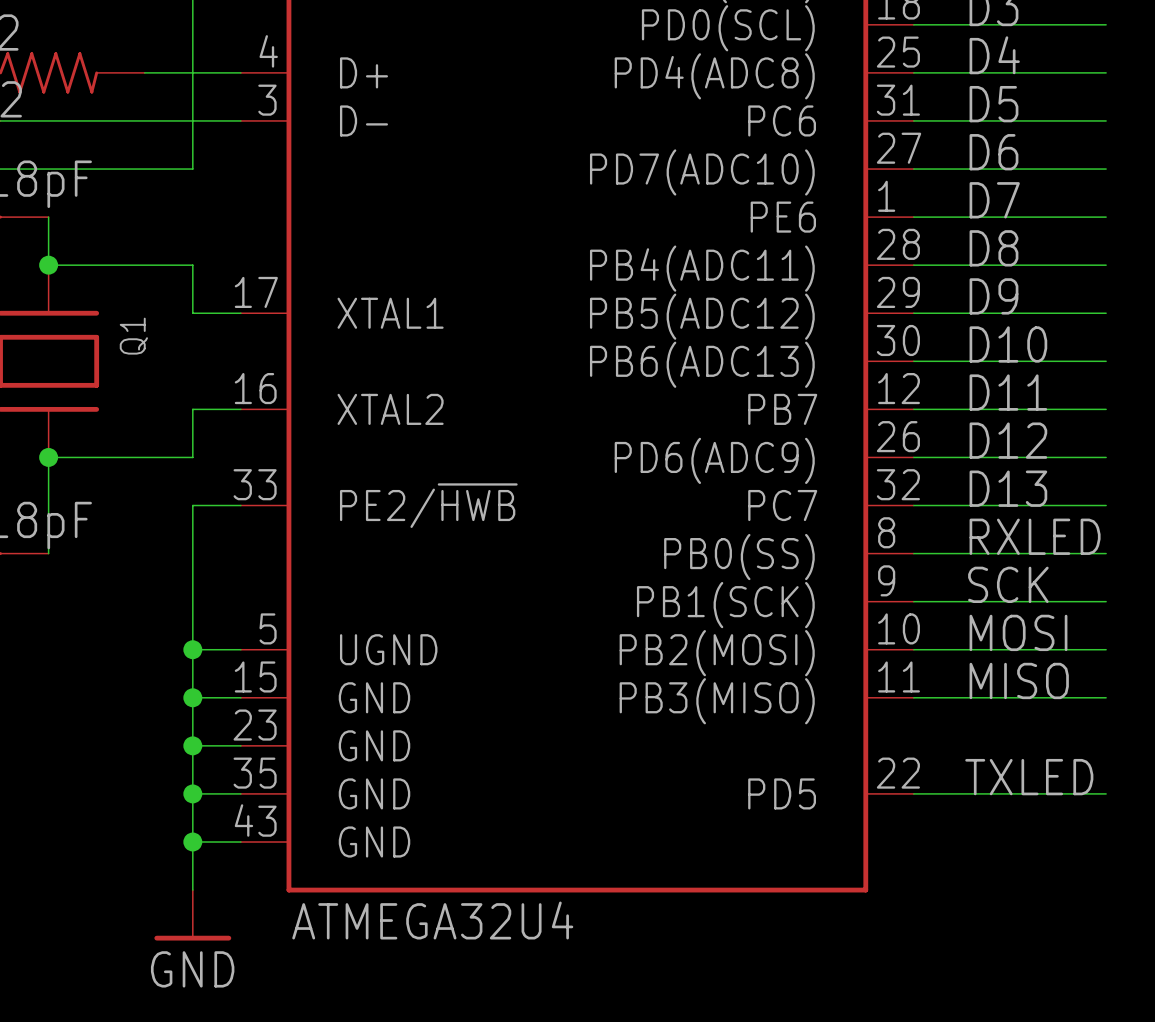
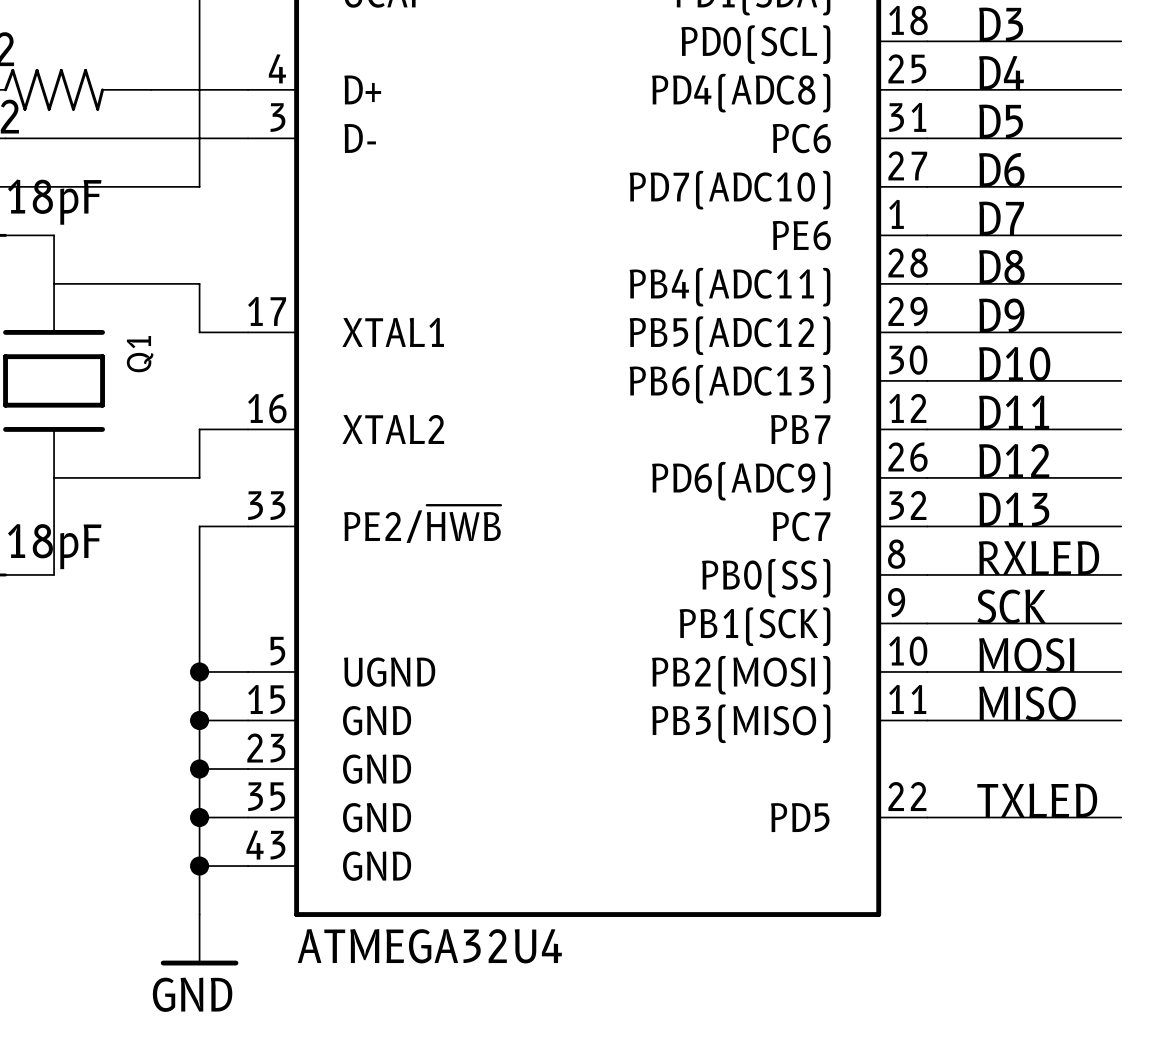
junction: (48, 265) -> none
junction: (48, 457) -> none

